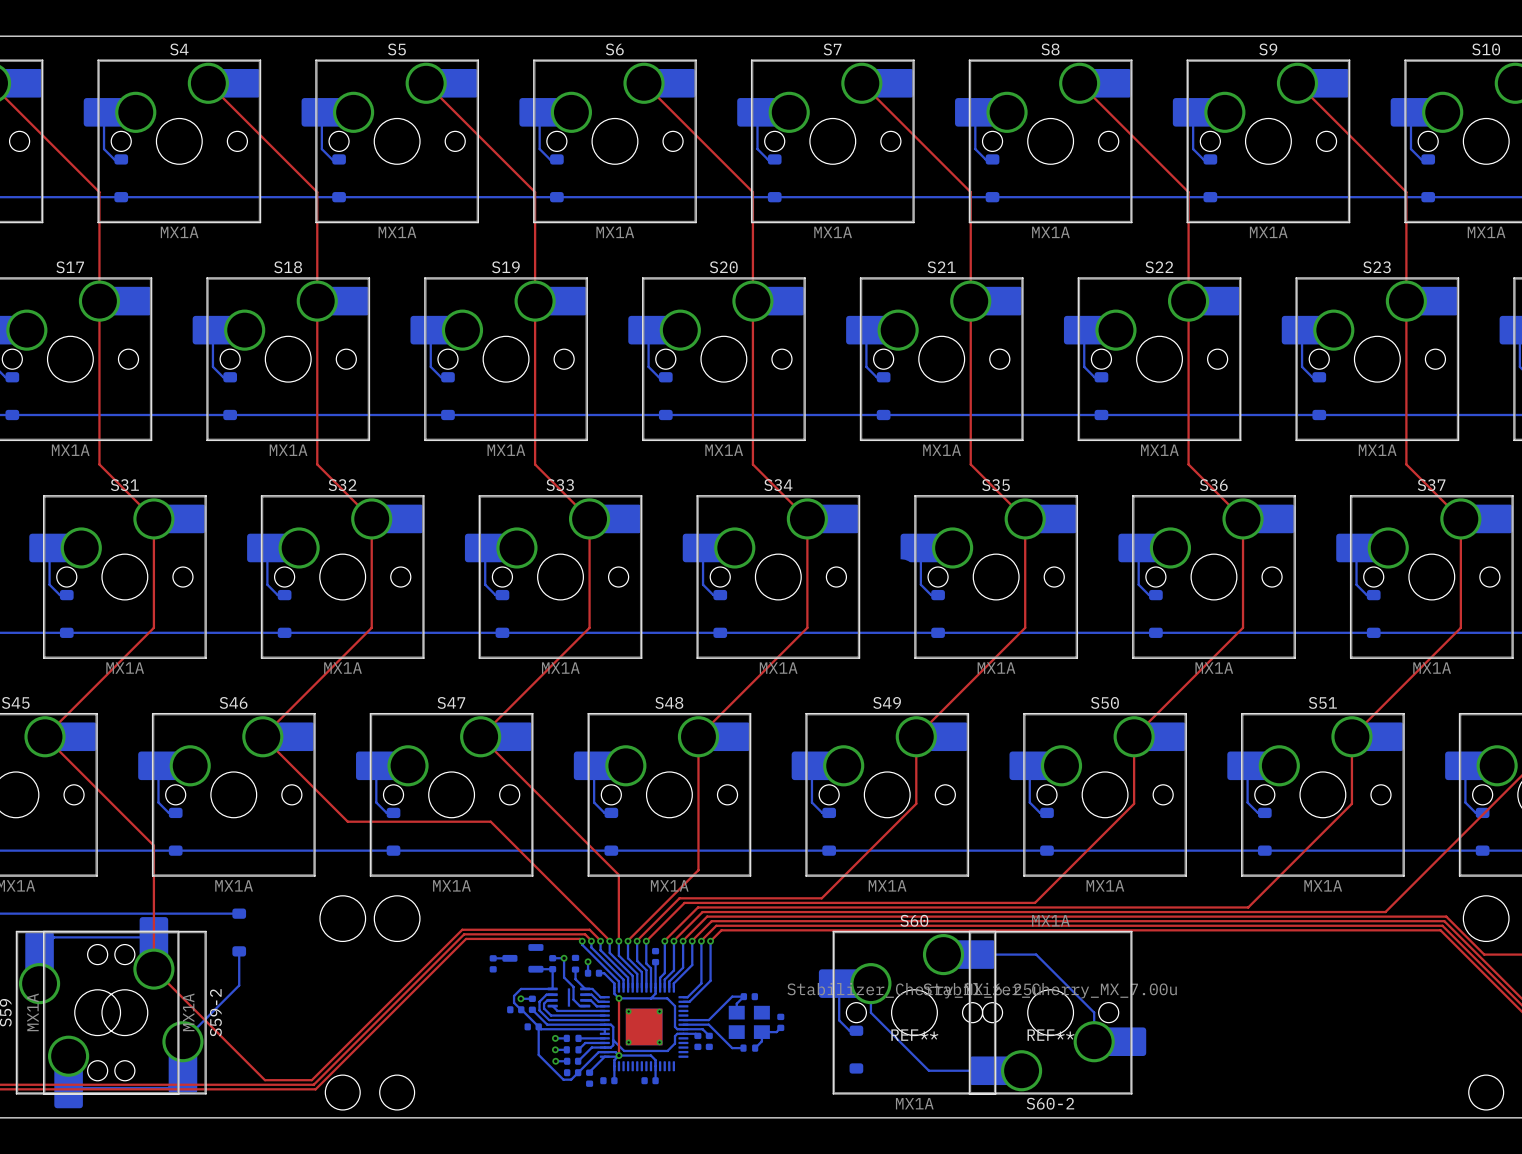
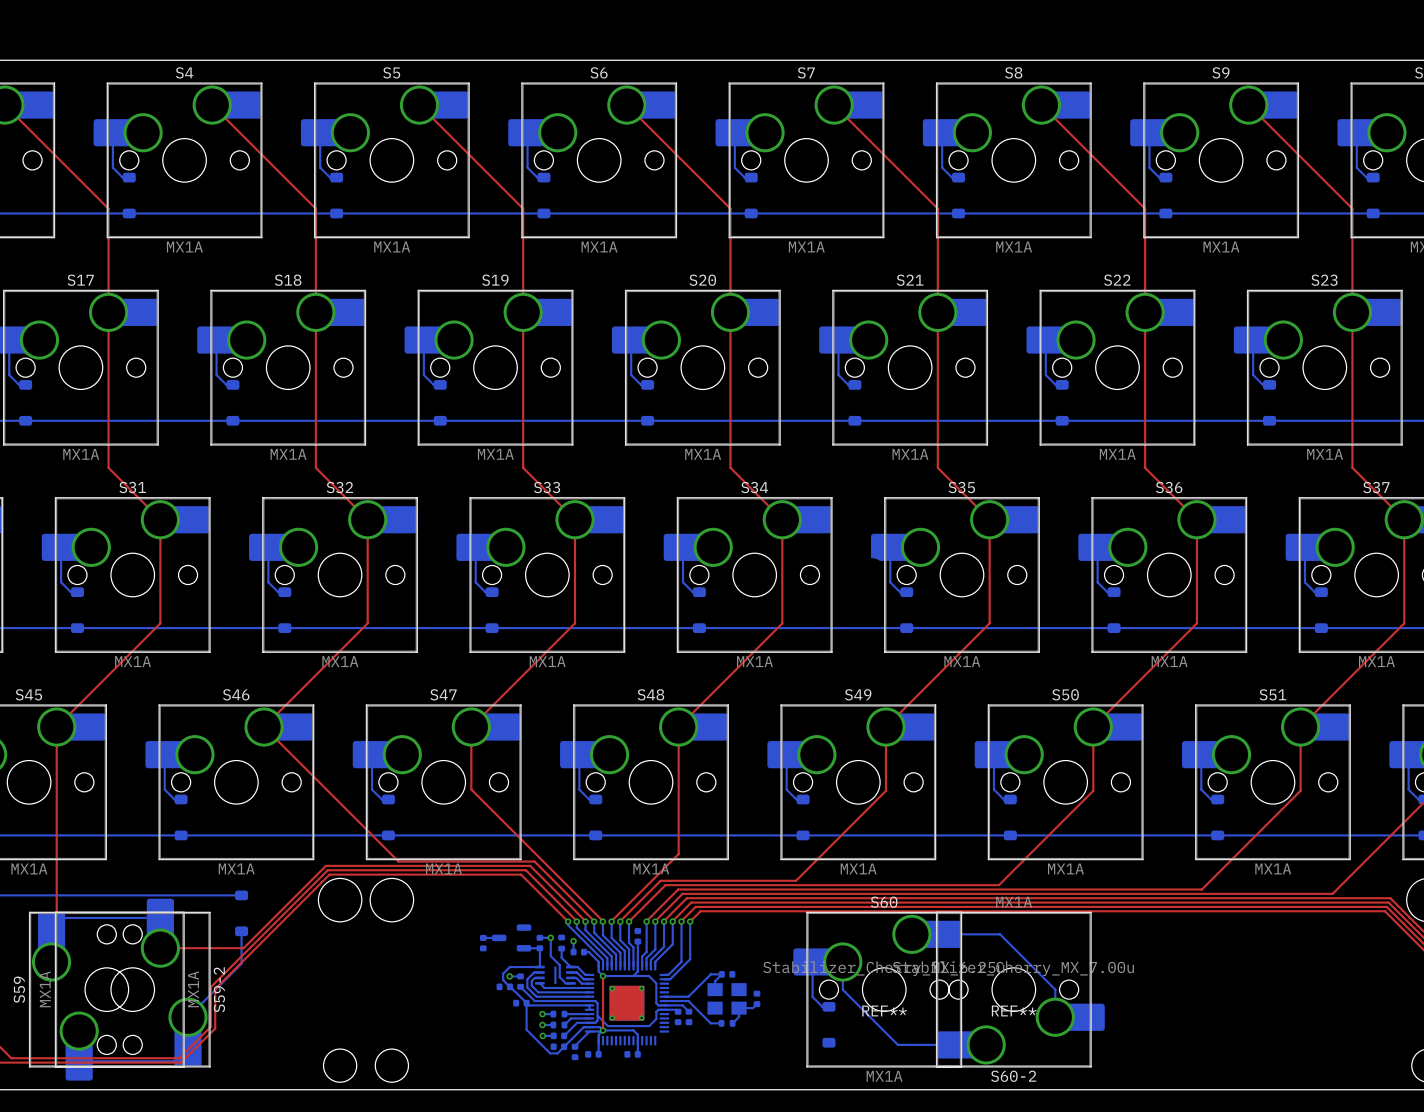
top track: (45, 736) (153, 845) (153, 969) (264, 1080) (311, 1080) (462, 929) (589, 929) -> (160, 948) (243, 948) (325, 865) (530, 865) (575, 910)
top track: none -> (56, 727) (56, 956) (51, 961)
top track: (480, 736) (618, 874) (618, 940) -> (471, 727) (471, 789) (602, 921)
top track: (347, 821) (490, 821) (547, 878) -> (344, 807) (398, 861) (534, 861)
top track: (585, 934) (464, 934) (313, 1084) (173, 1084) -> (570, 915) (525, 870) (327, 870) (210, 987) (210, 1026) (179, 1058)
top track: (579, 938) (466, 938) (315, 1089) (175, 1089) -> (565, 919) (521, 874) (329, 874) (215, 988) (215, 1028) (181, 1062)

